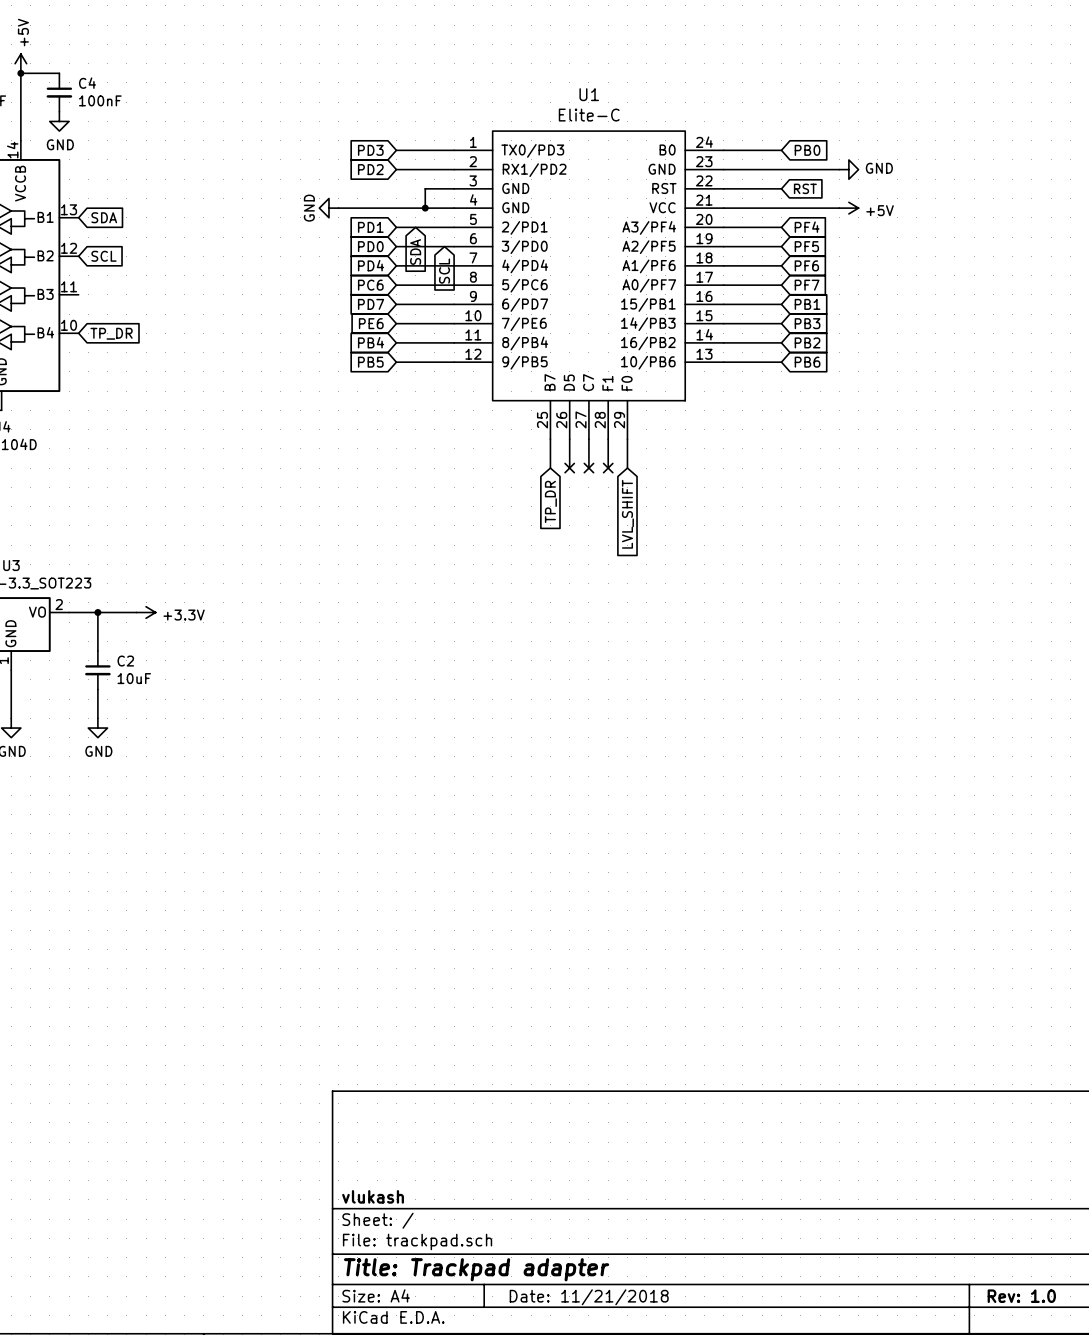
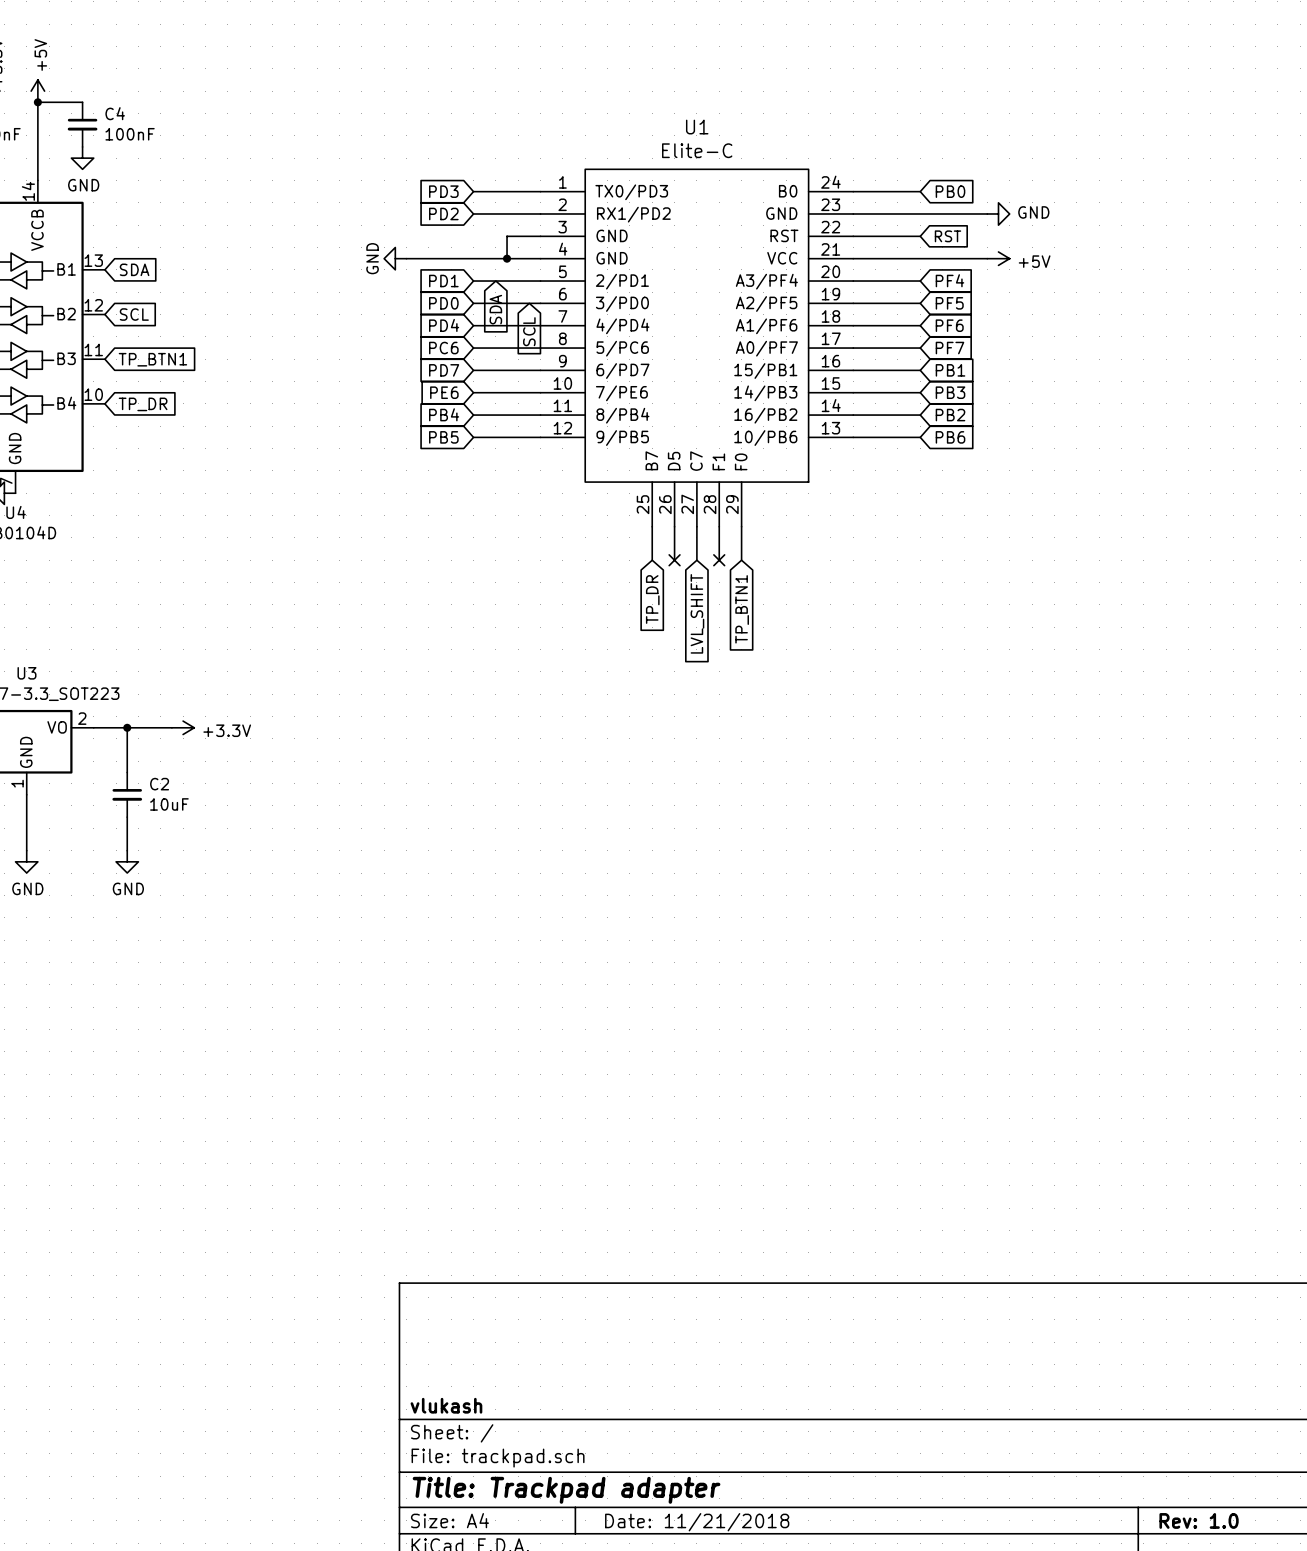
global label: none -> TP_BTN1 (152, 359)
no-connect mark: (588, 468) -> none
global label: none -> LVL_SHIFT (697, 613)
global label: LVL_SHIFT (627, 514) -> TP_BTN1 (742, 609)

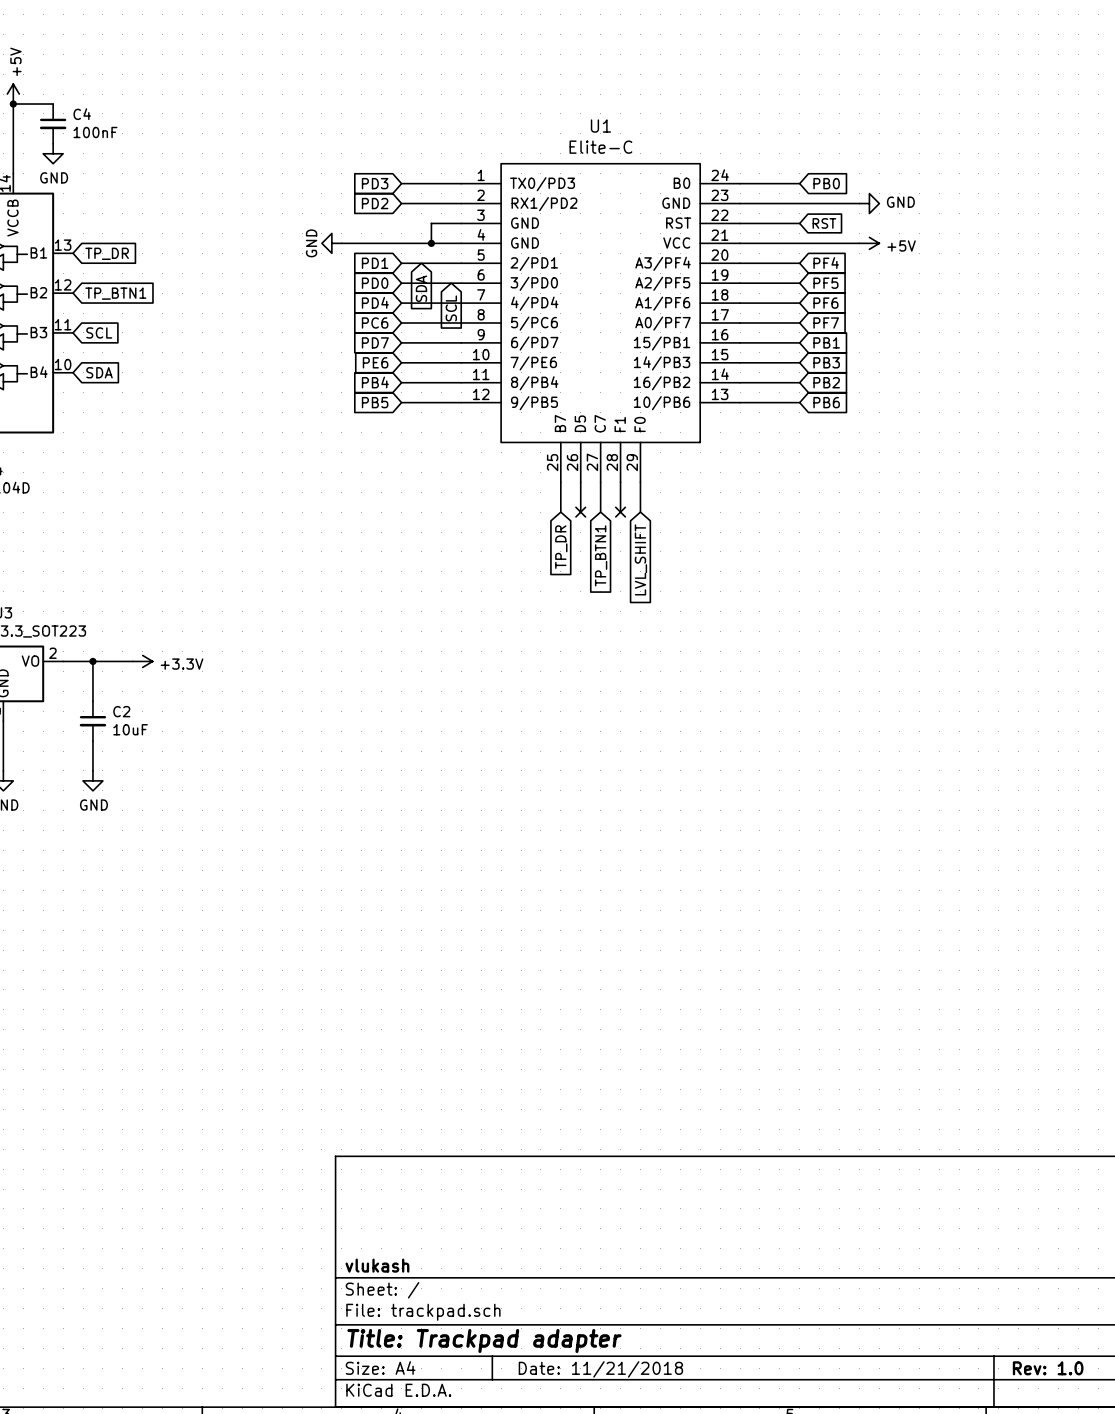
global label: SDA (134, 269) -> TP_DR (107, 253)
global label: SCL (134, 314) -> TP_BTN1 (115, 293)
global label: TP_BTN1 (152, 359) -> SCL (99, 332)
global label: TP_DR (143, 404) -> SDA (99, 372)
global label: TP_BTN1 (742, 609) -> LVL_SHIFT (640, 559)
global label: LVL_SHIFT (697, 613) -> TP_BTN1 (601, 555)

